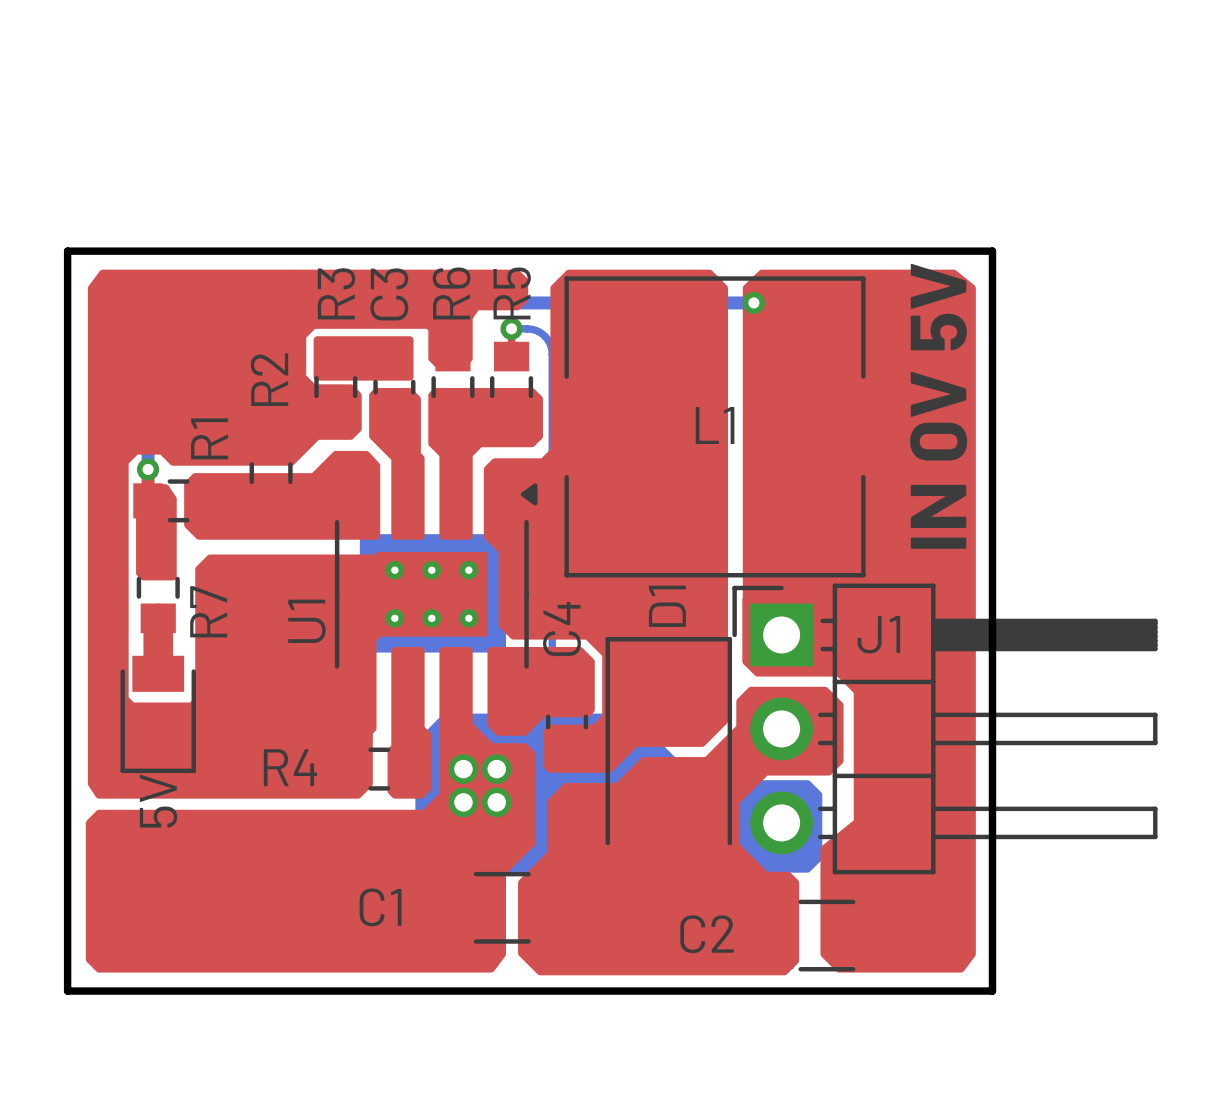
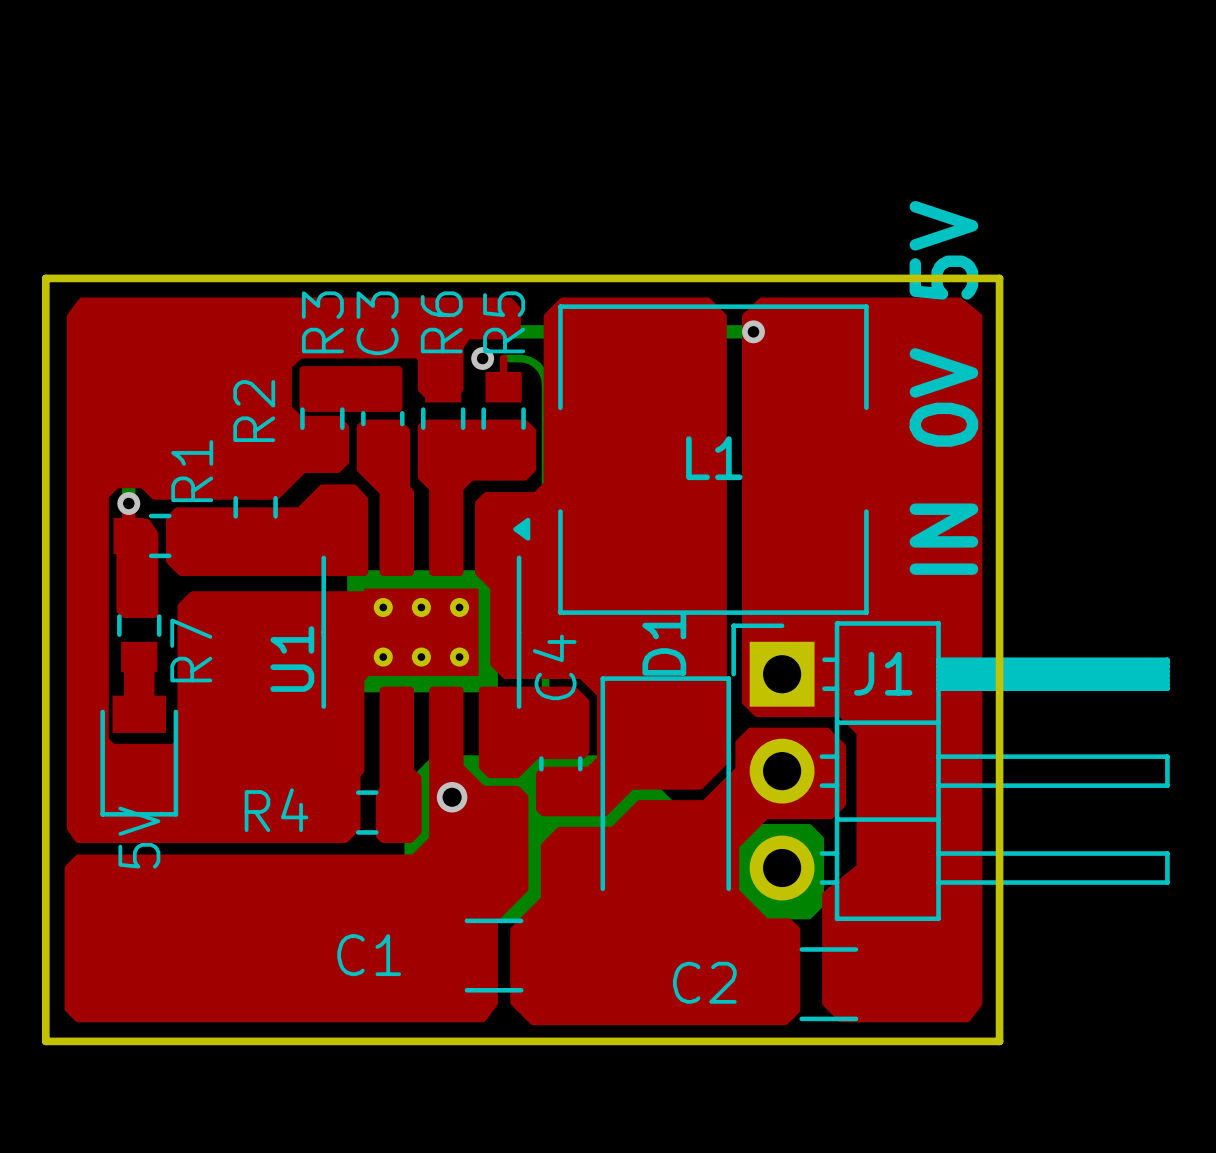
via position: (511, 328) -> (482, 358)
via position: (463, 769) -> (452, 797)
via: (496, 769) -> none
via: (463, 802) -> none
via: (496, 802) -> none

